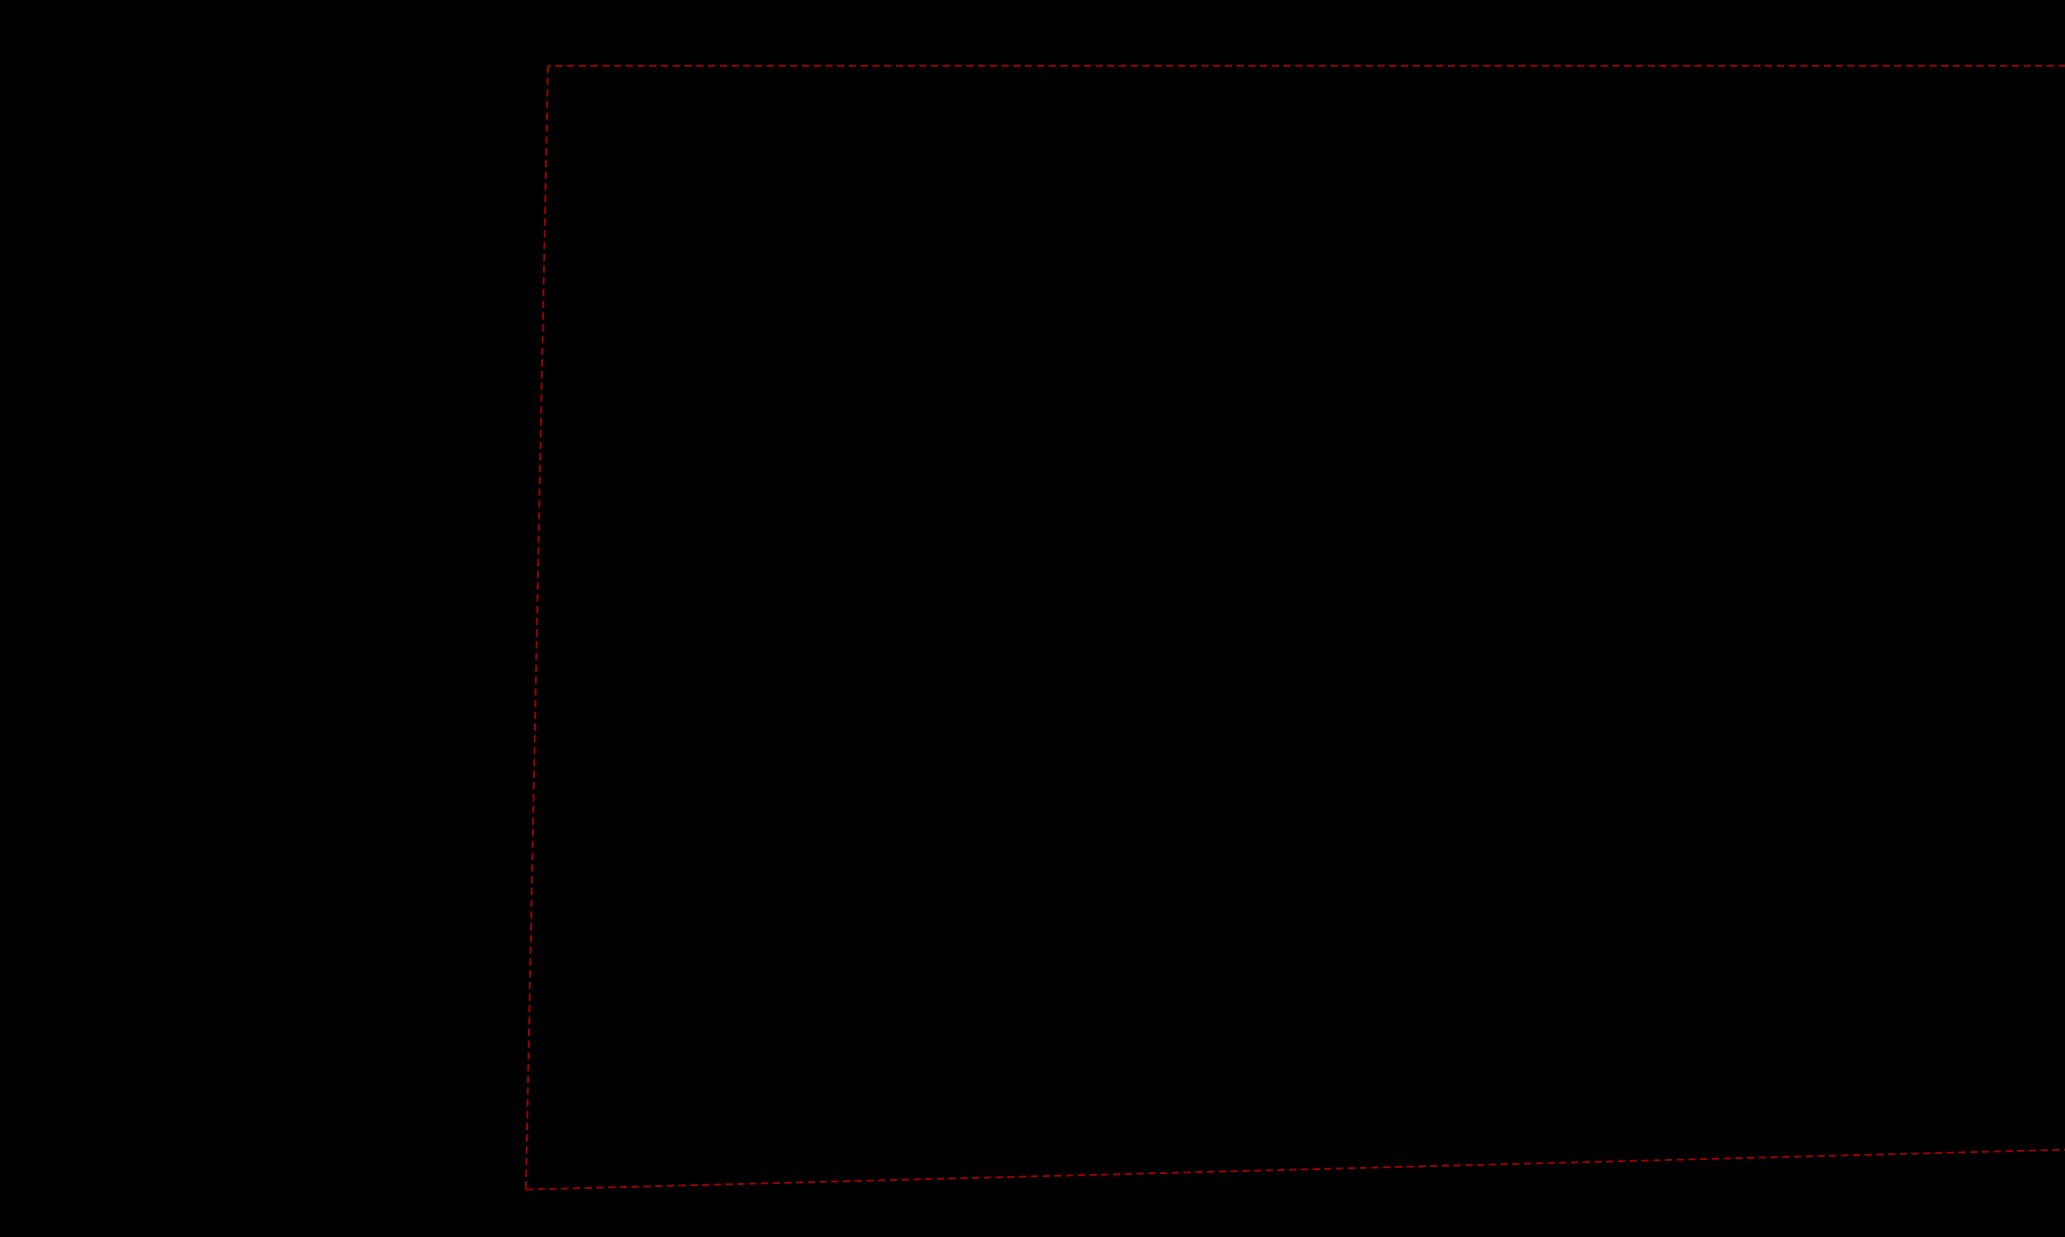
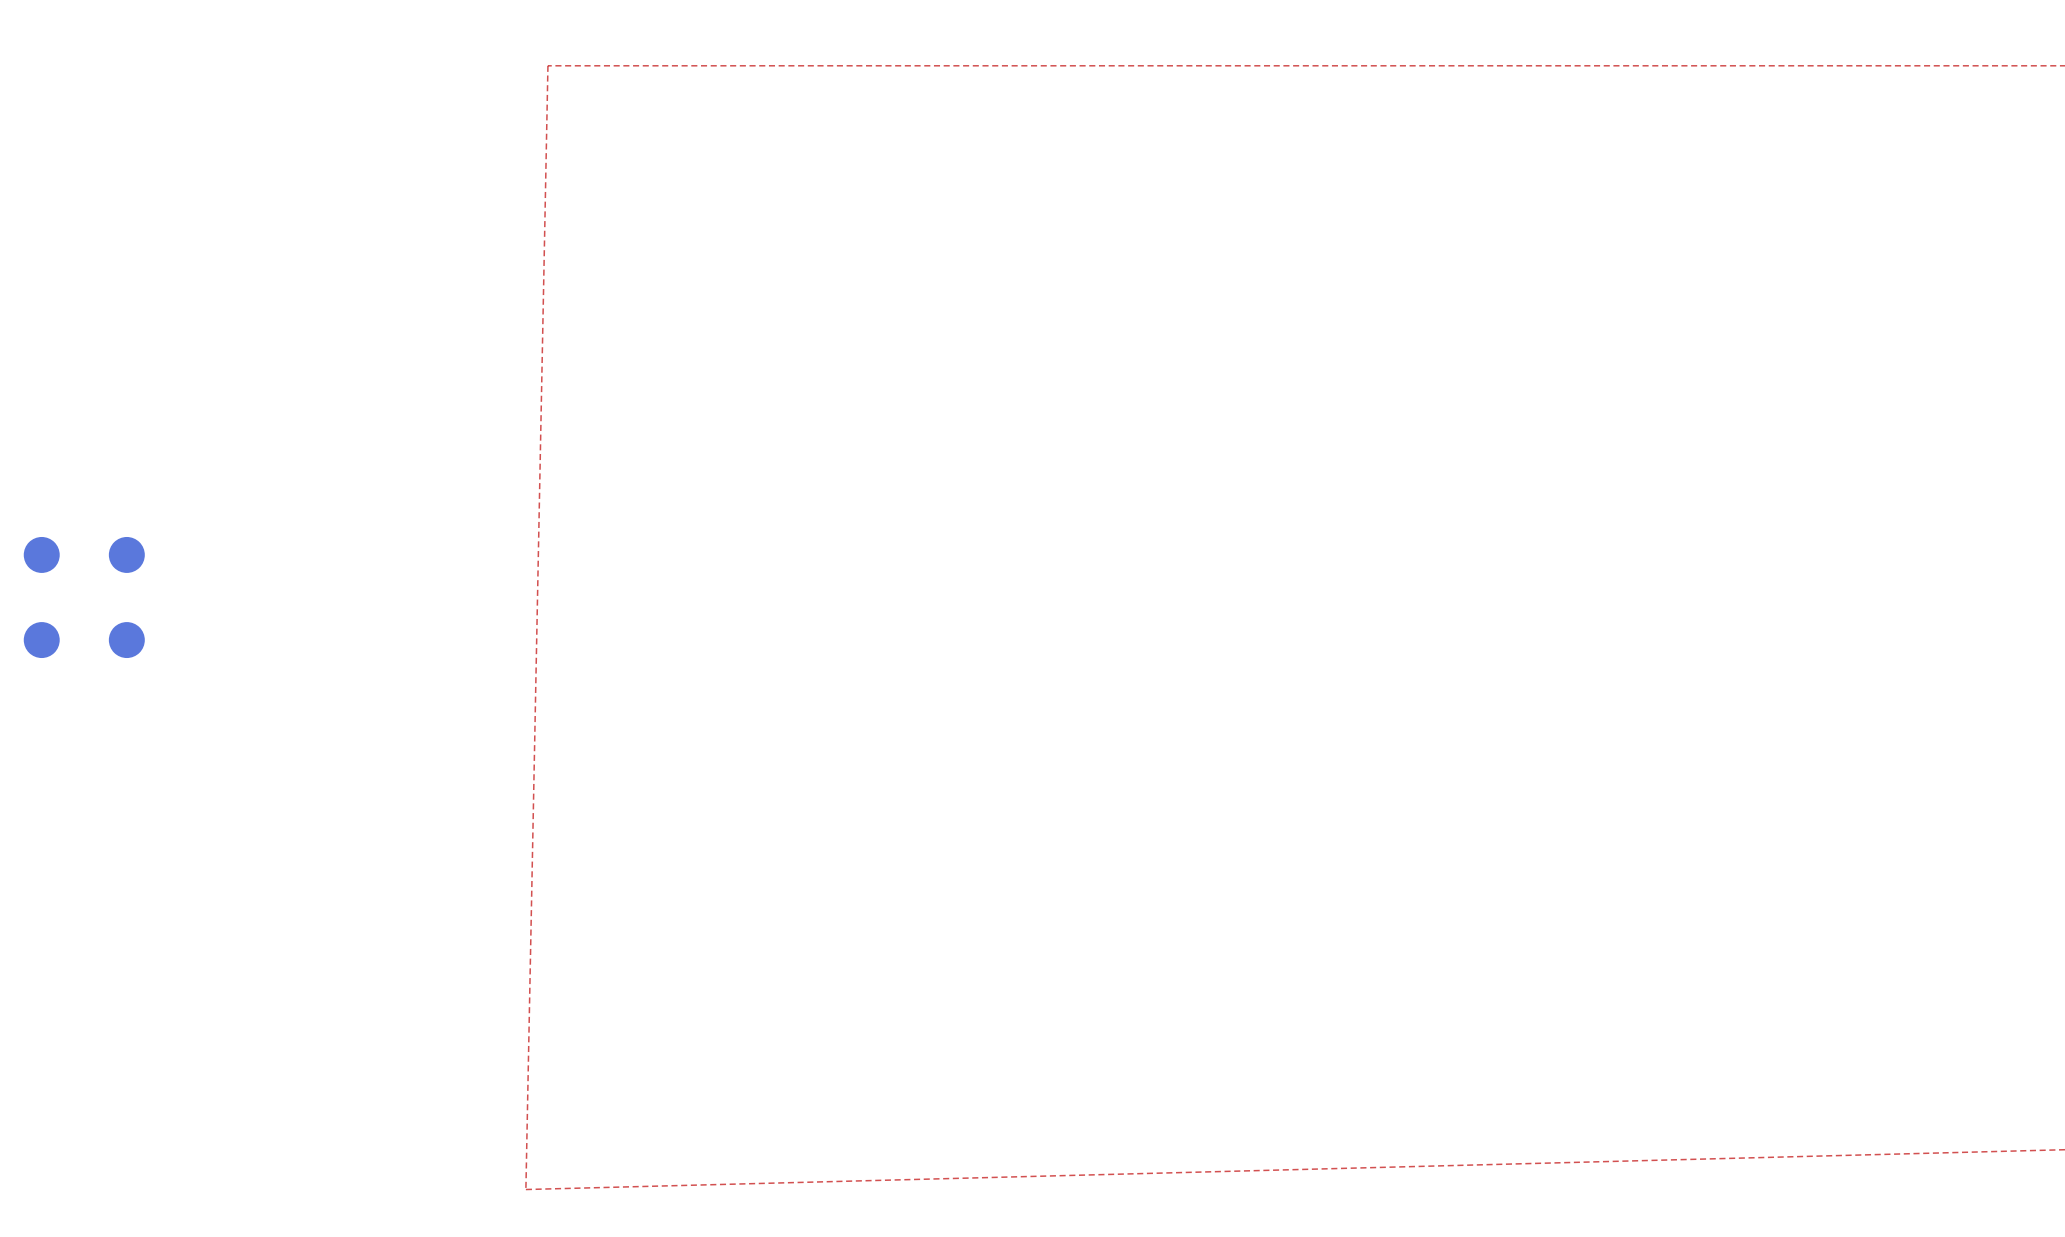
part: none -> (41, 554)
part: none -> (126, 554)
part: none -> (41, 640)
part: none -> (126, 640)

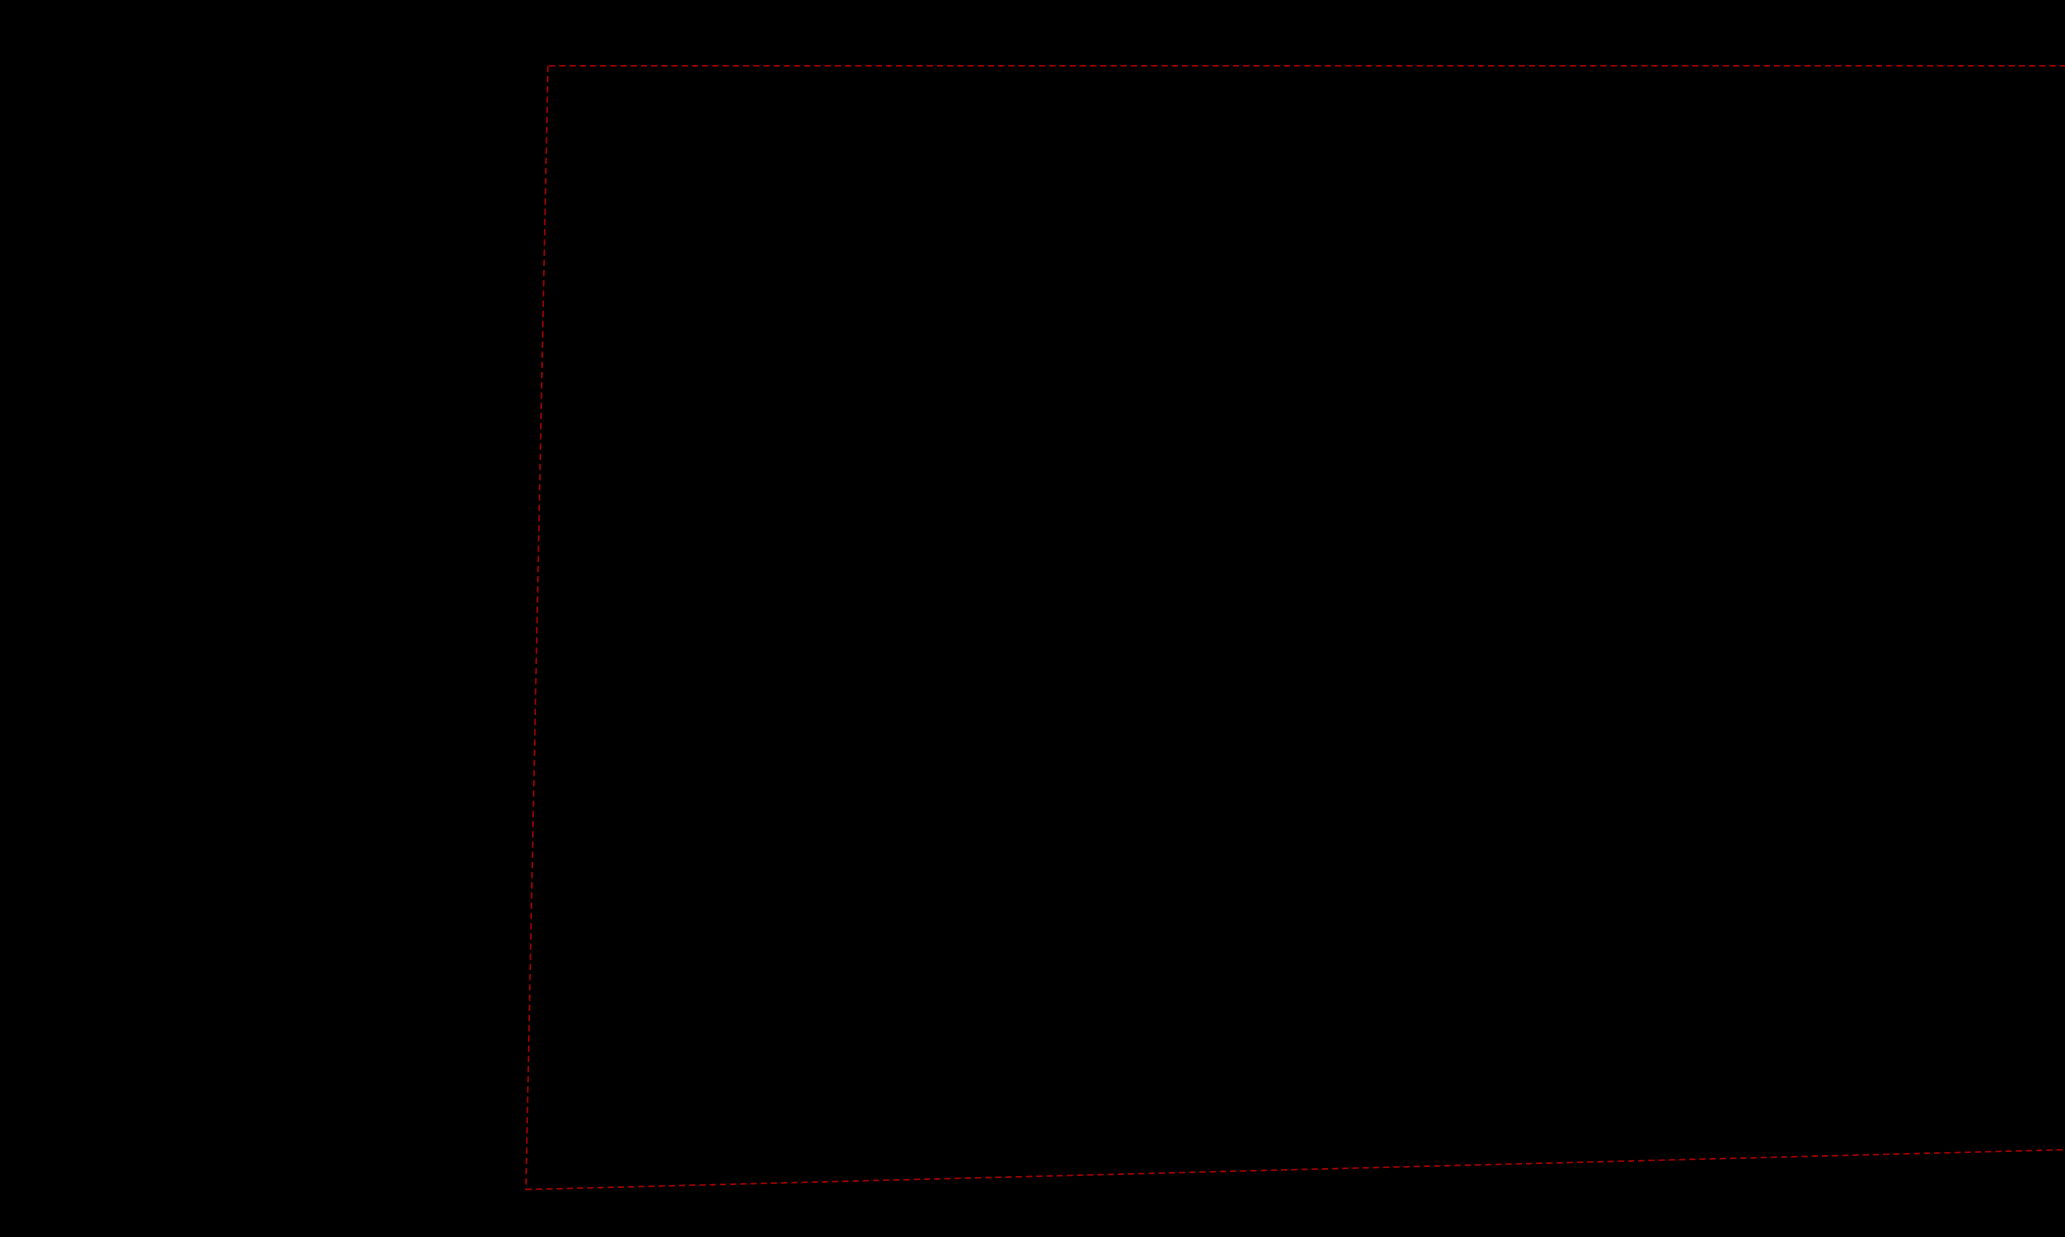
part: (41, 554) -> none
part: (126, 554) -> none
part: (41, 640) -> none
part: (126, 640) -> none

